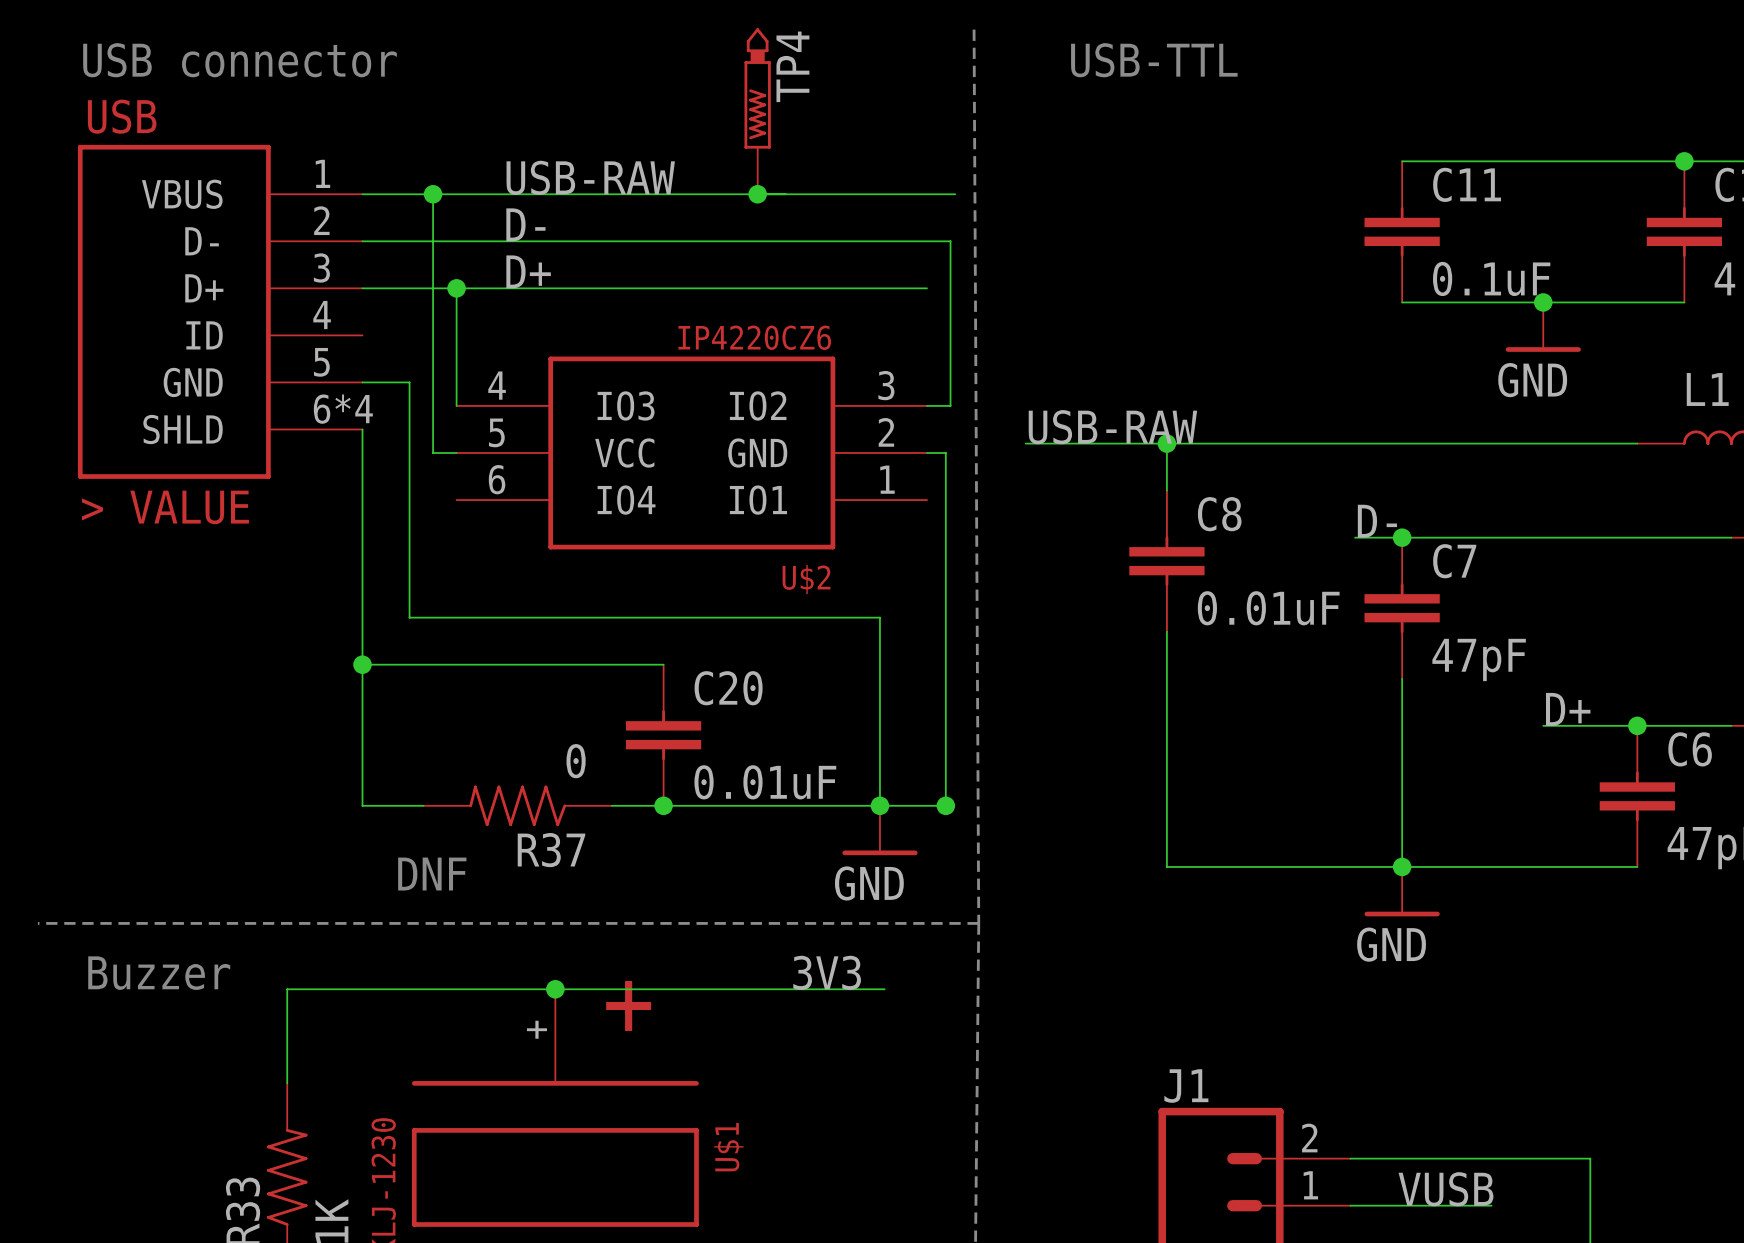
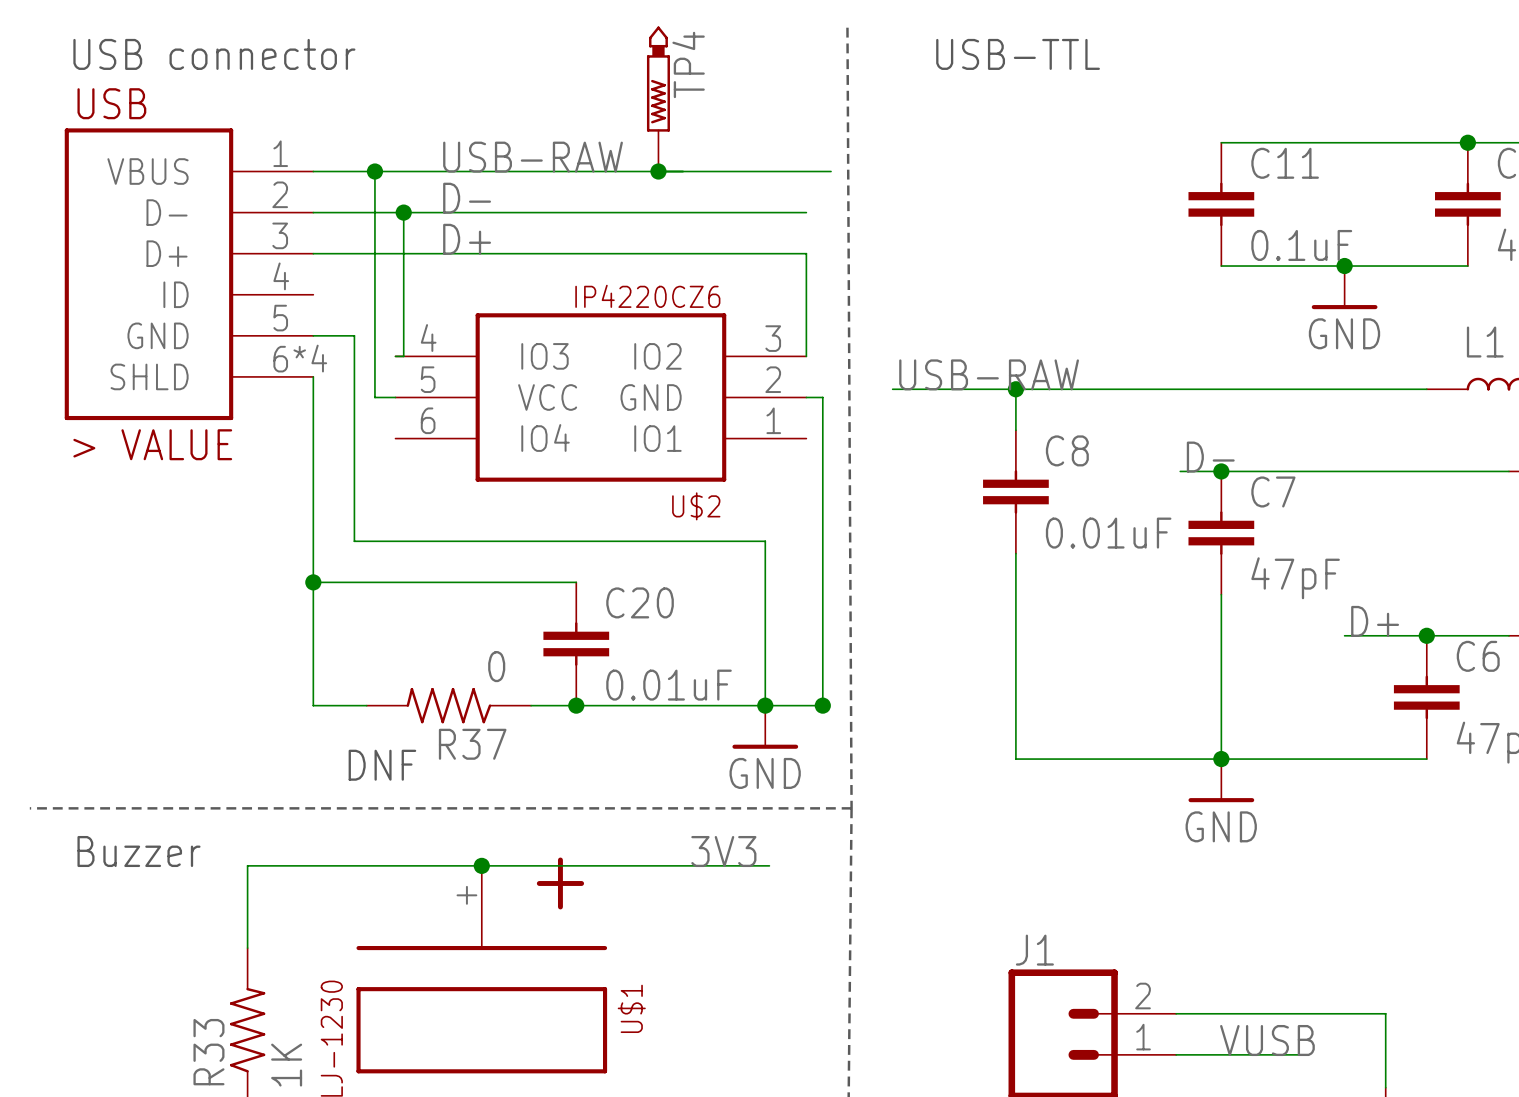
wire: (927, 241) (950, 241) (950, 405) (927, 405) -> (806, 253) (806, 356)
wire: (456, 288) (456, 405) -> (403, 212) (403, 356) (395, 356)
junction position: (456, 288) -> (403, 212)

